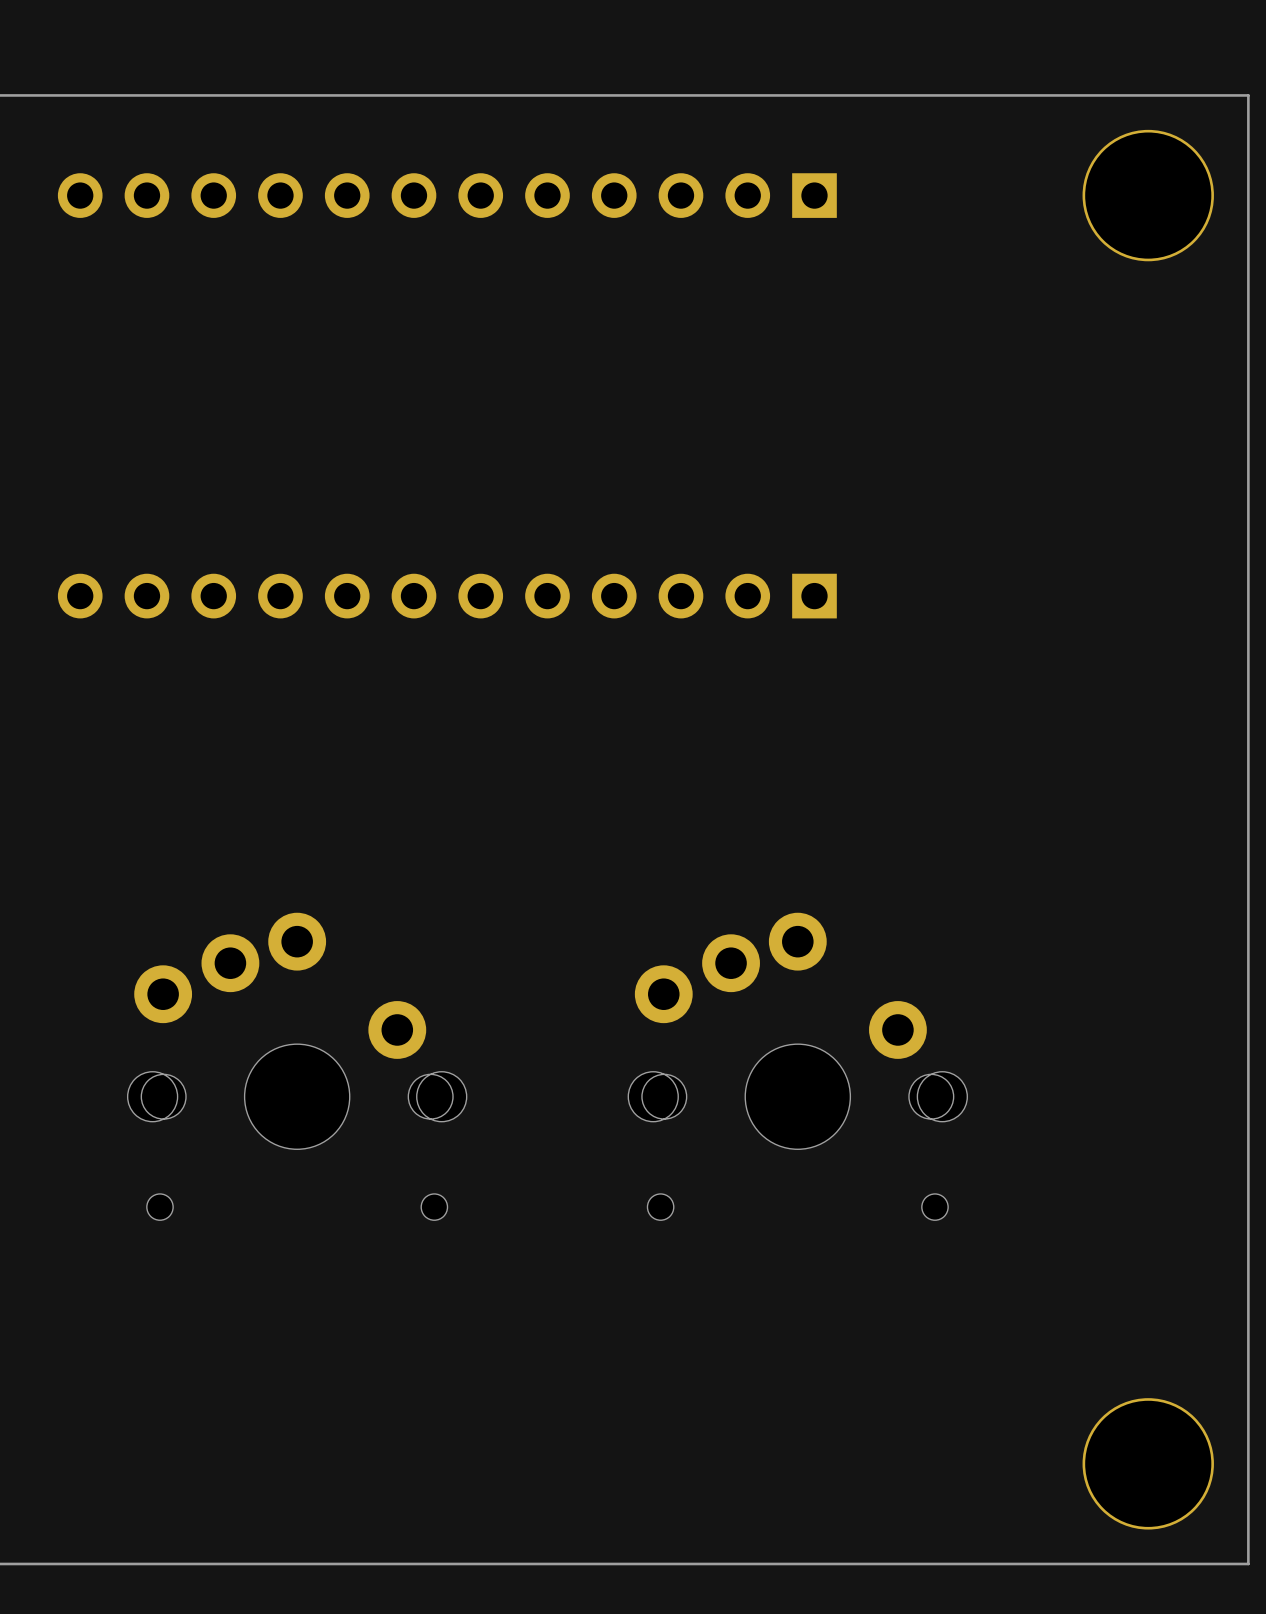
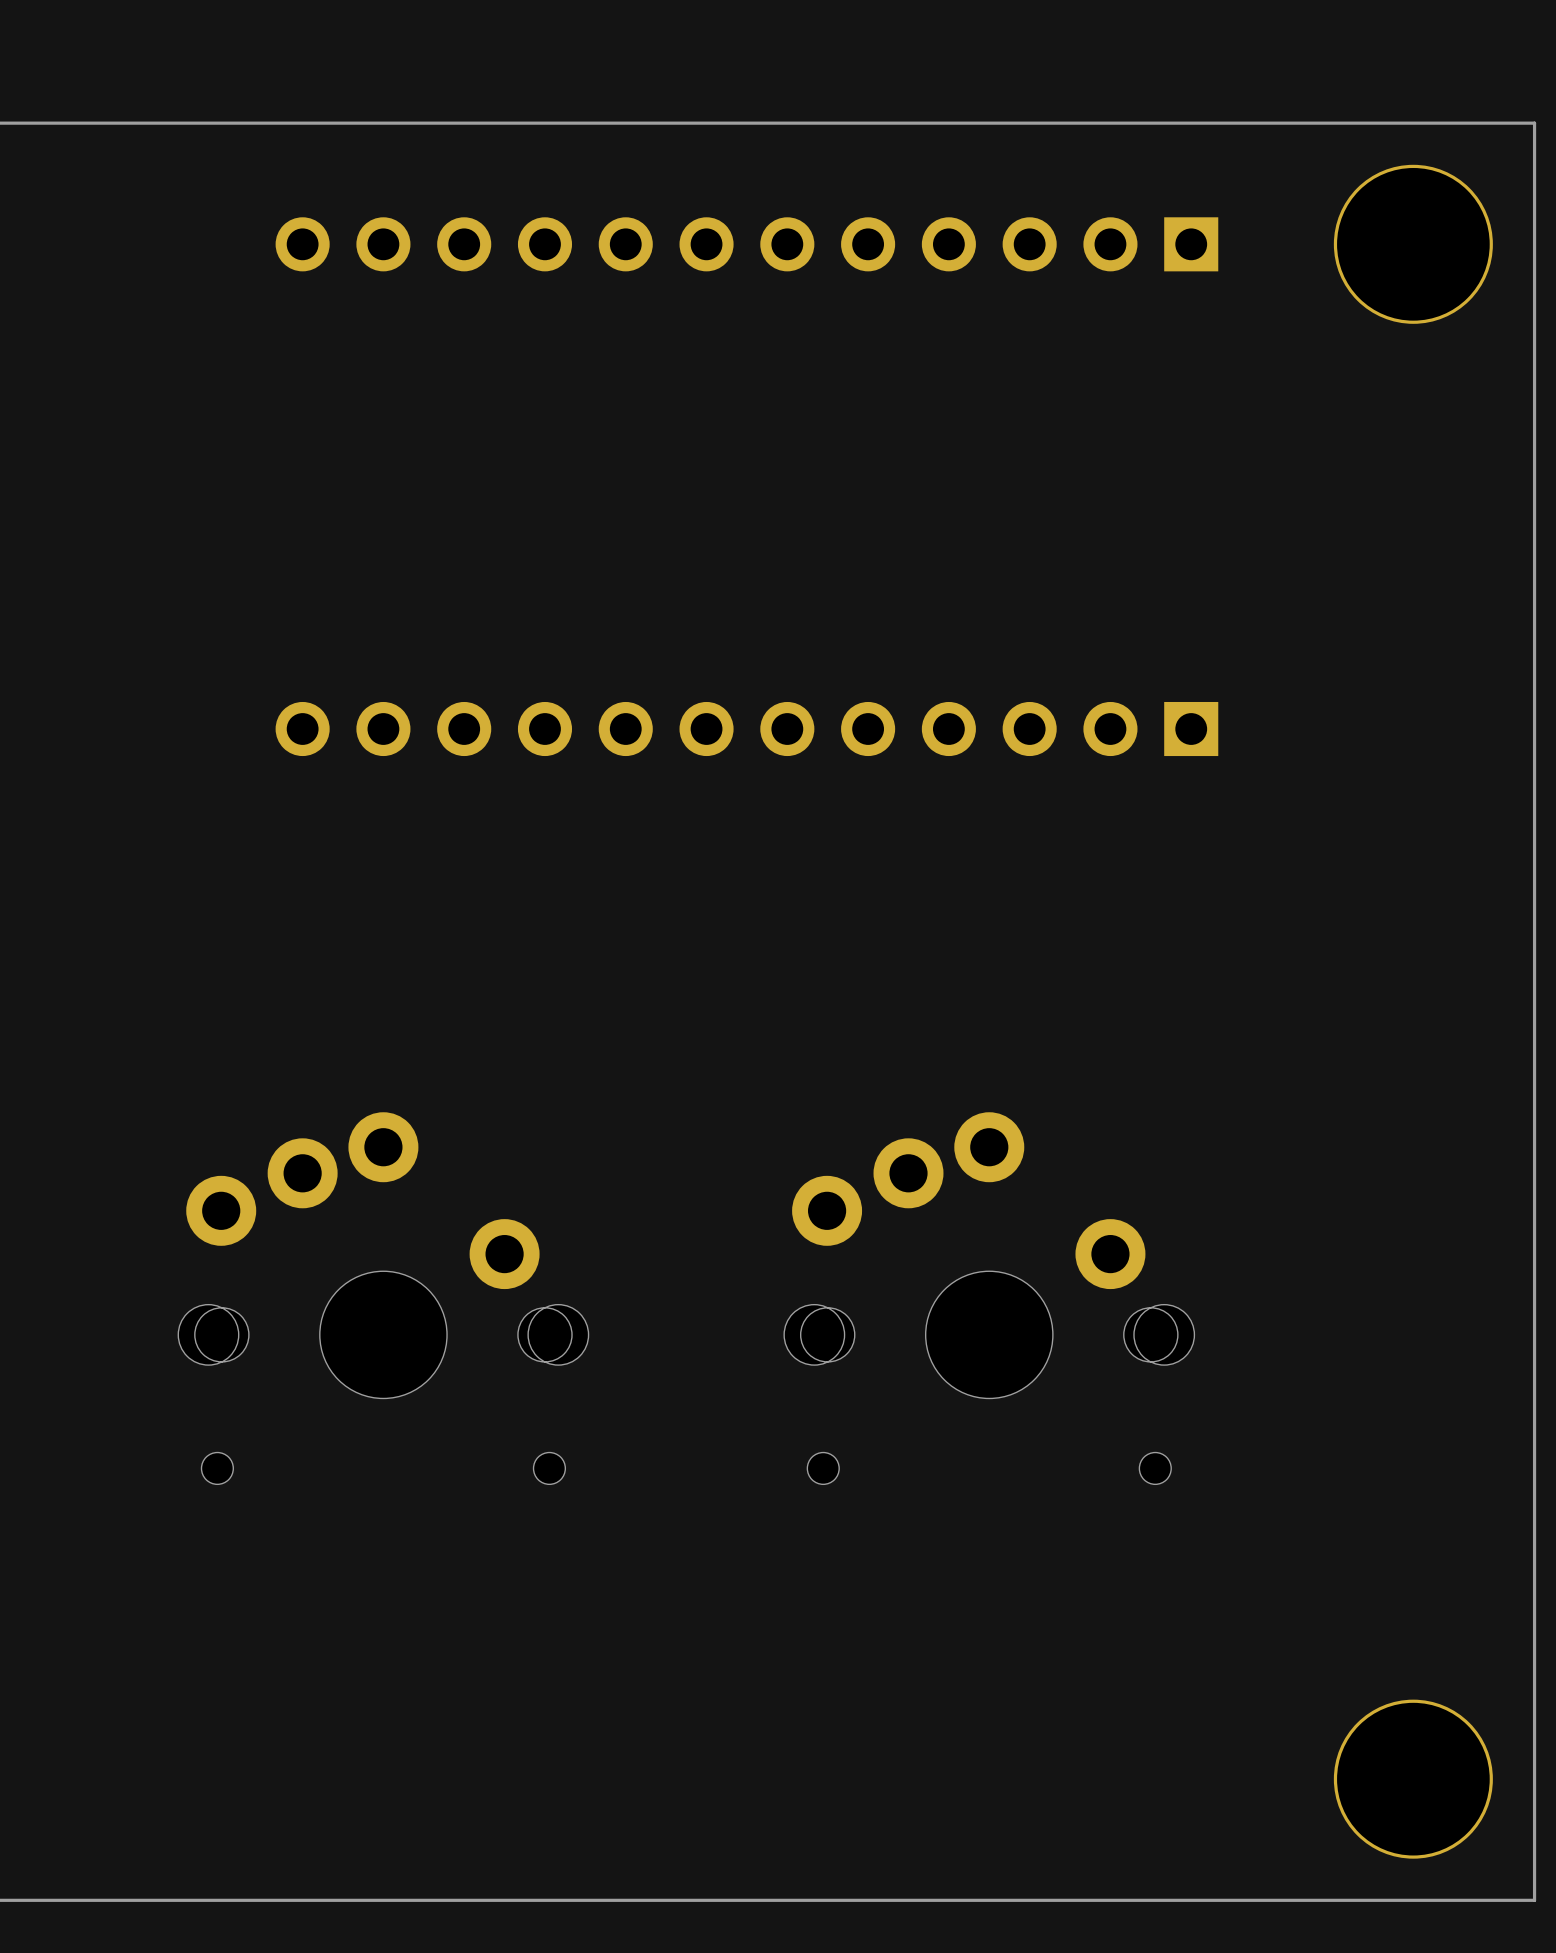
part position: (447, 195) -> (746, 244)
part position: (447, 596) -> (746, 729)

